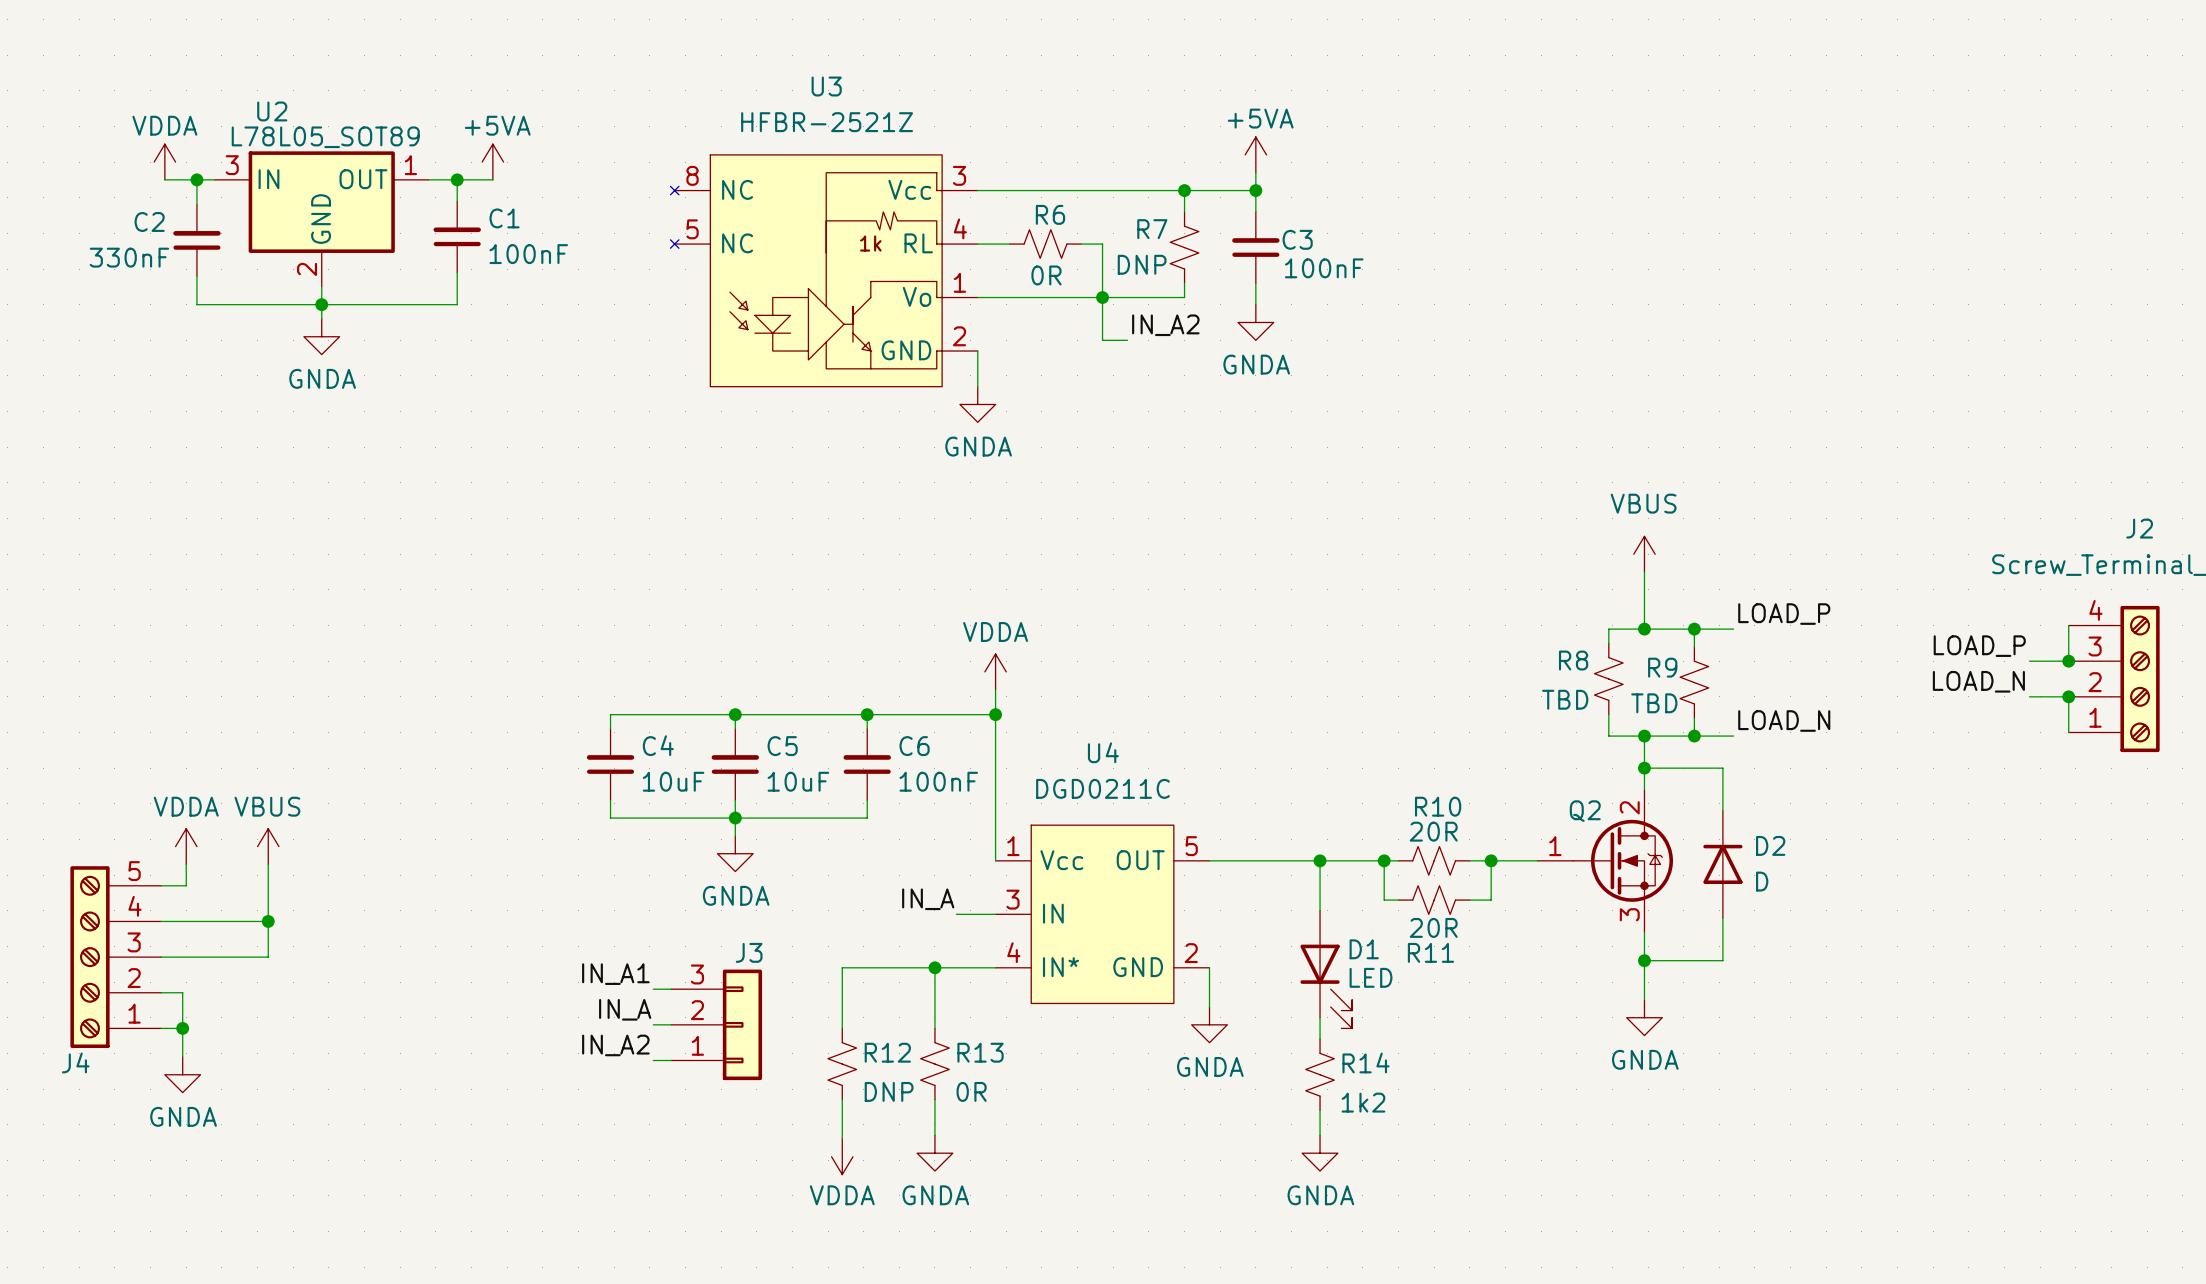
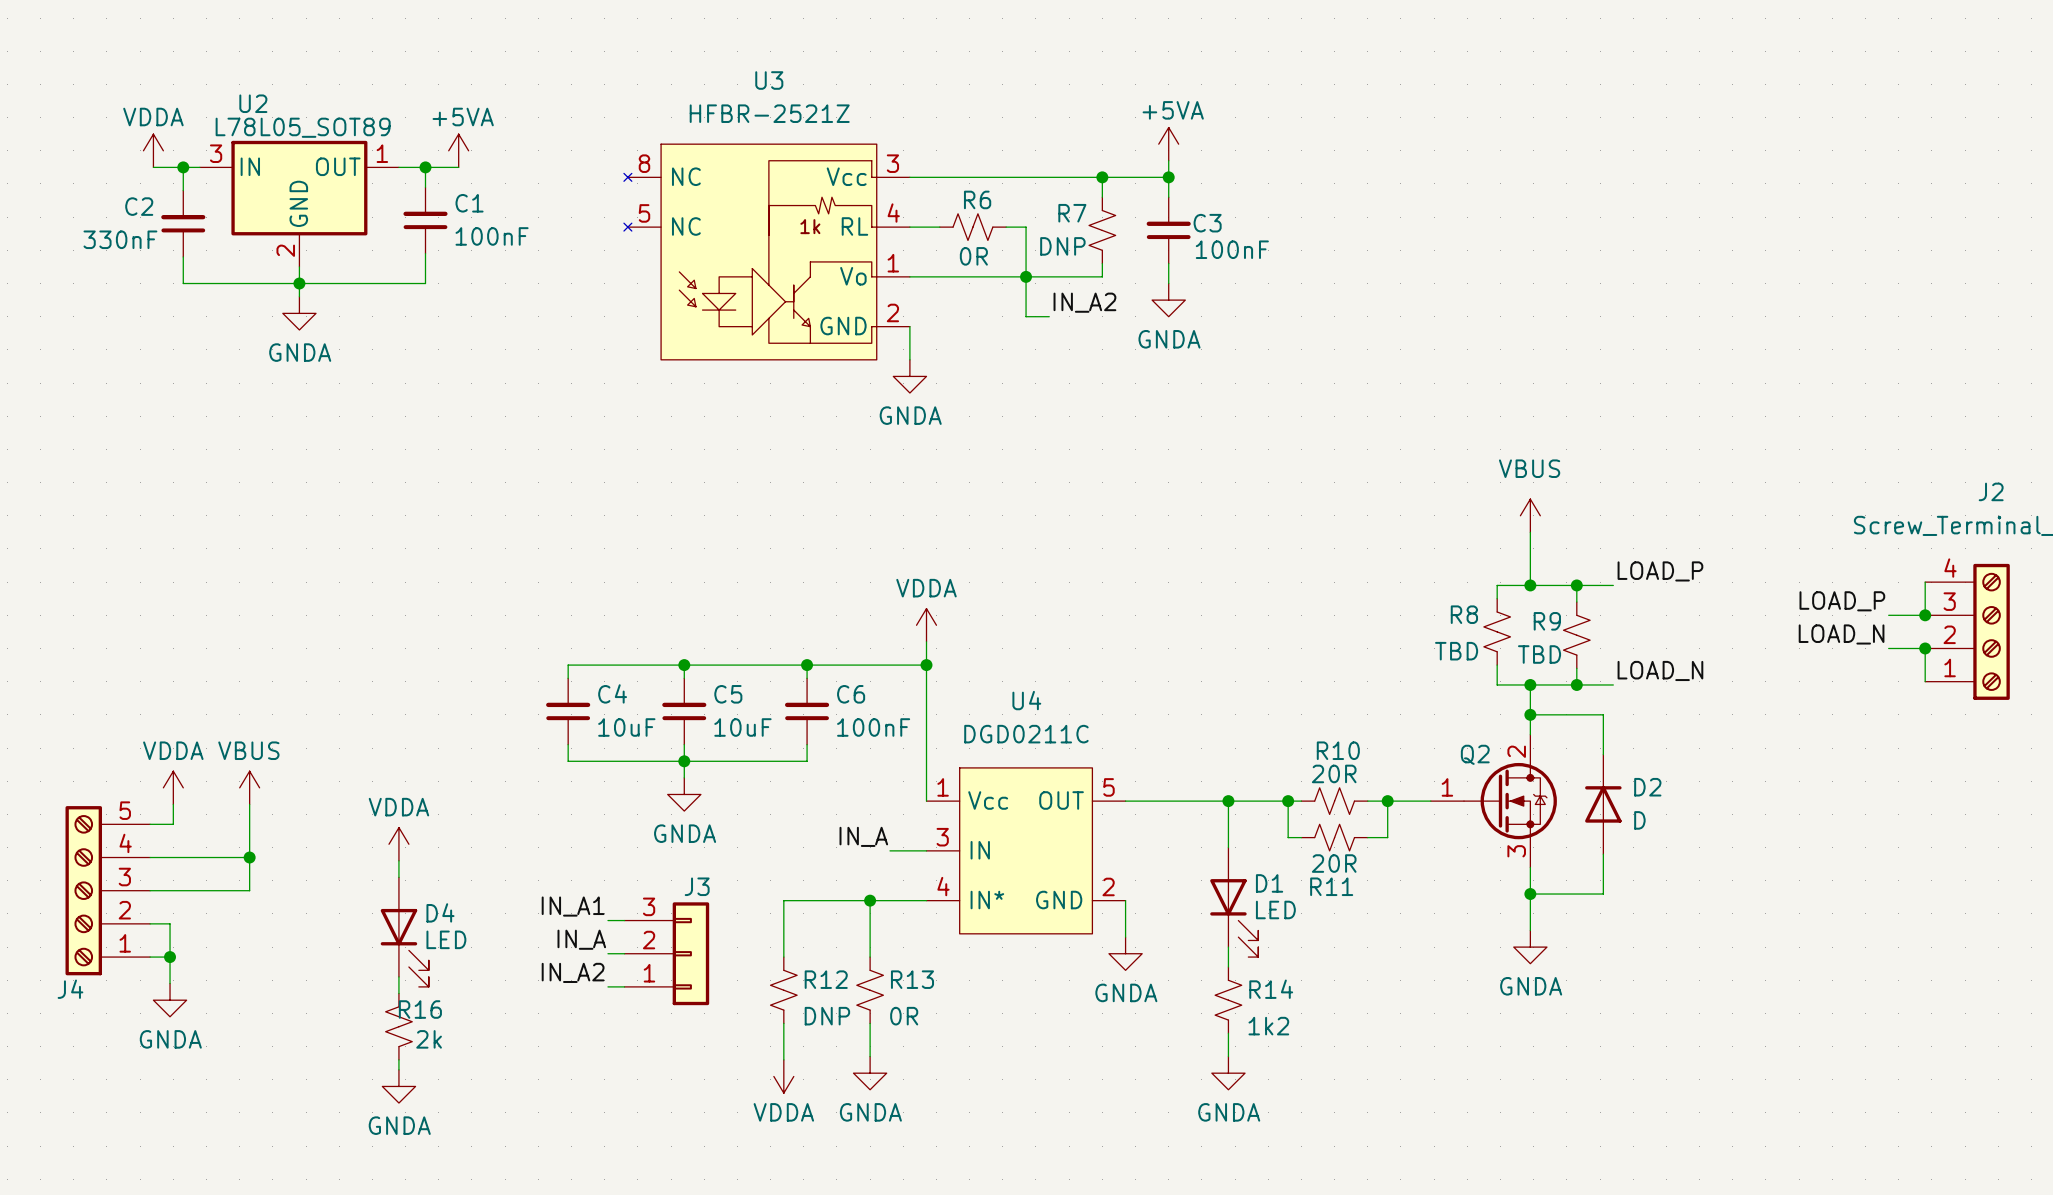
power symbol: none -> VDDA (398, 844)
wire: none -> (398, 860) (398, 877)
D4: none -> LED (404, 932)
wire: none -> (398, 976) (398, 993)
R16: none -> 2k (398, 1026)
wire: none -> (398, 1059) (398, 1069)
power symbol: none -> GNDA (398, 1086)

